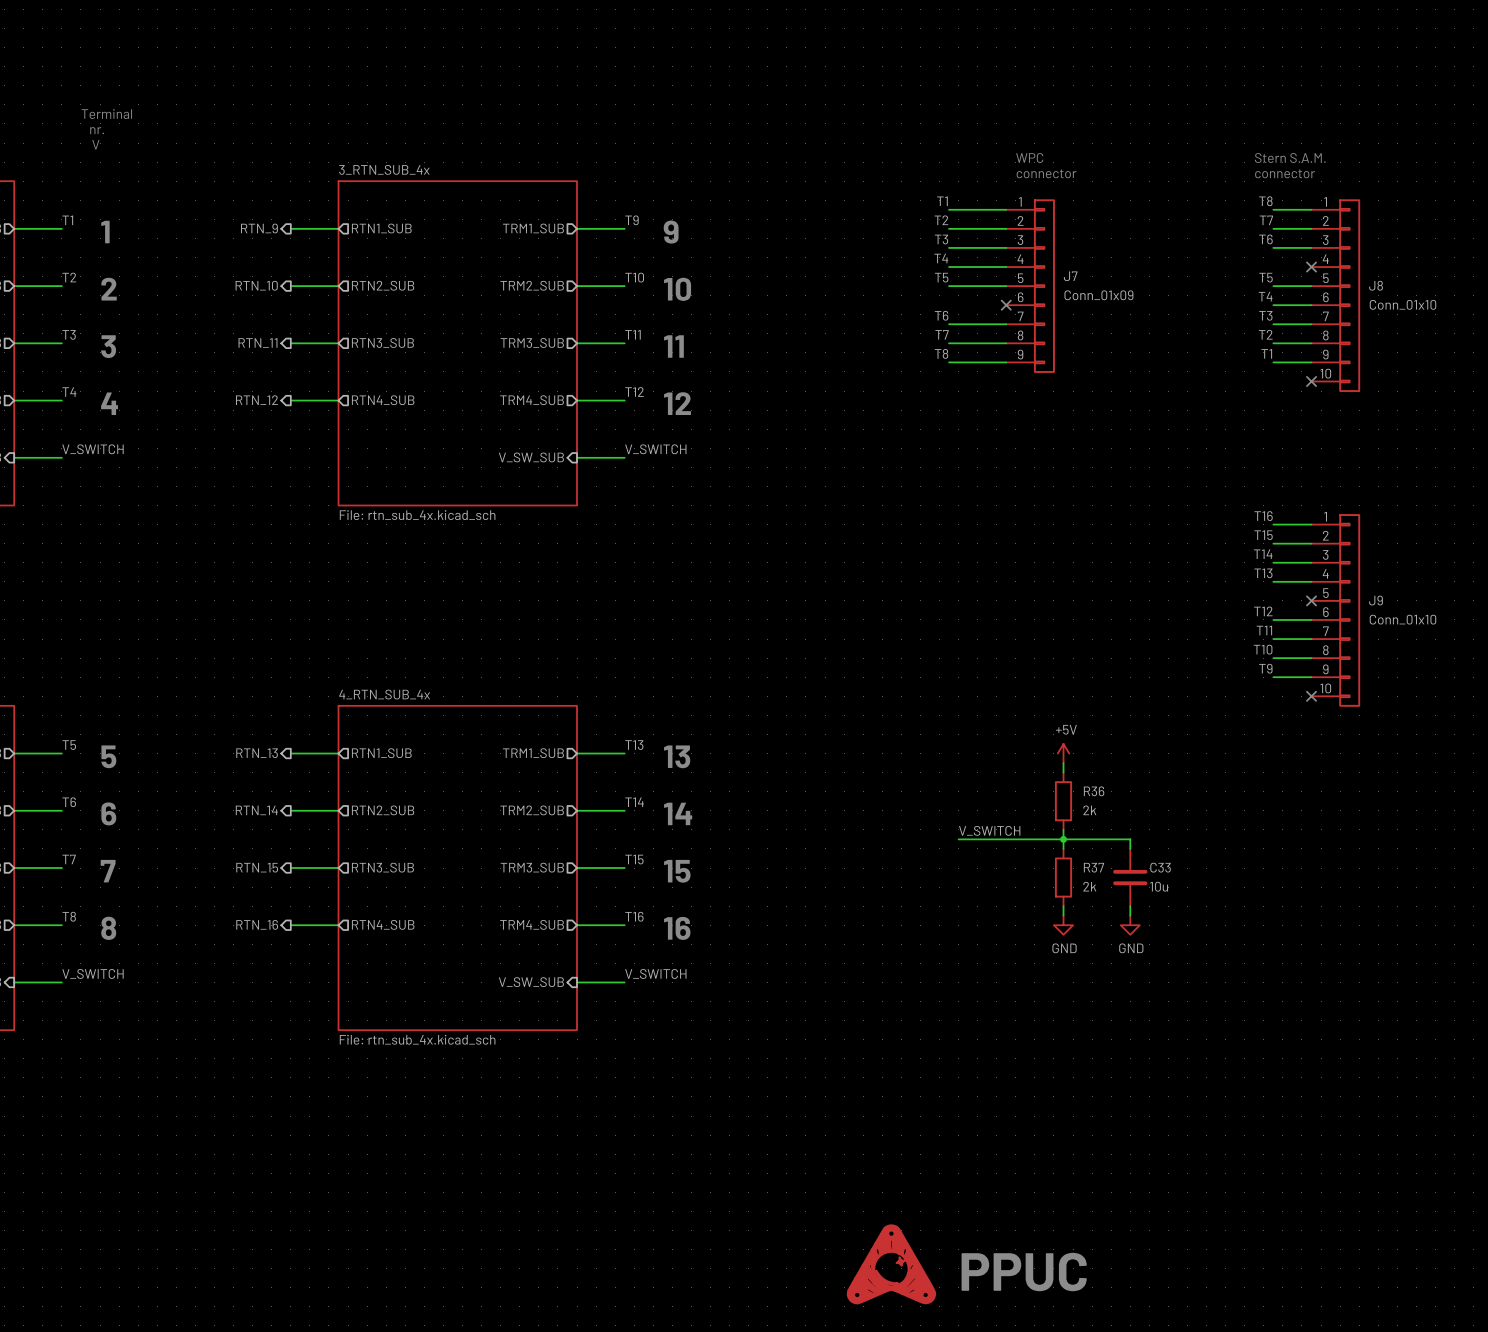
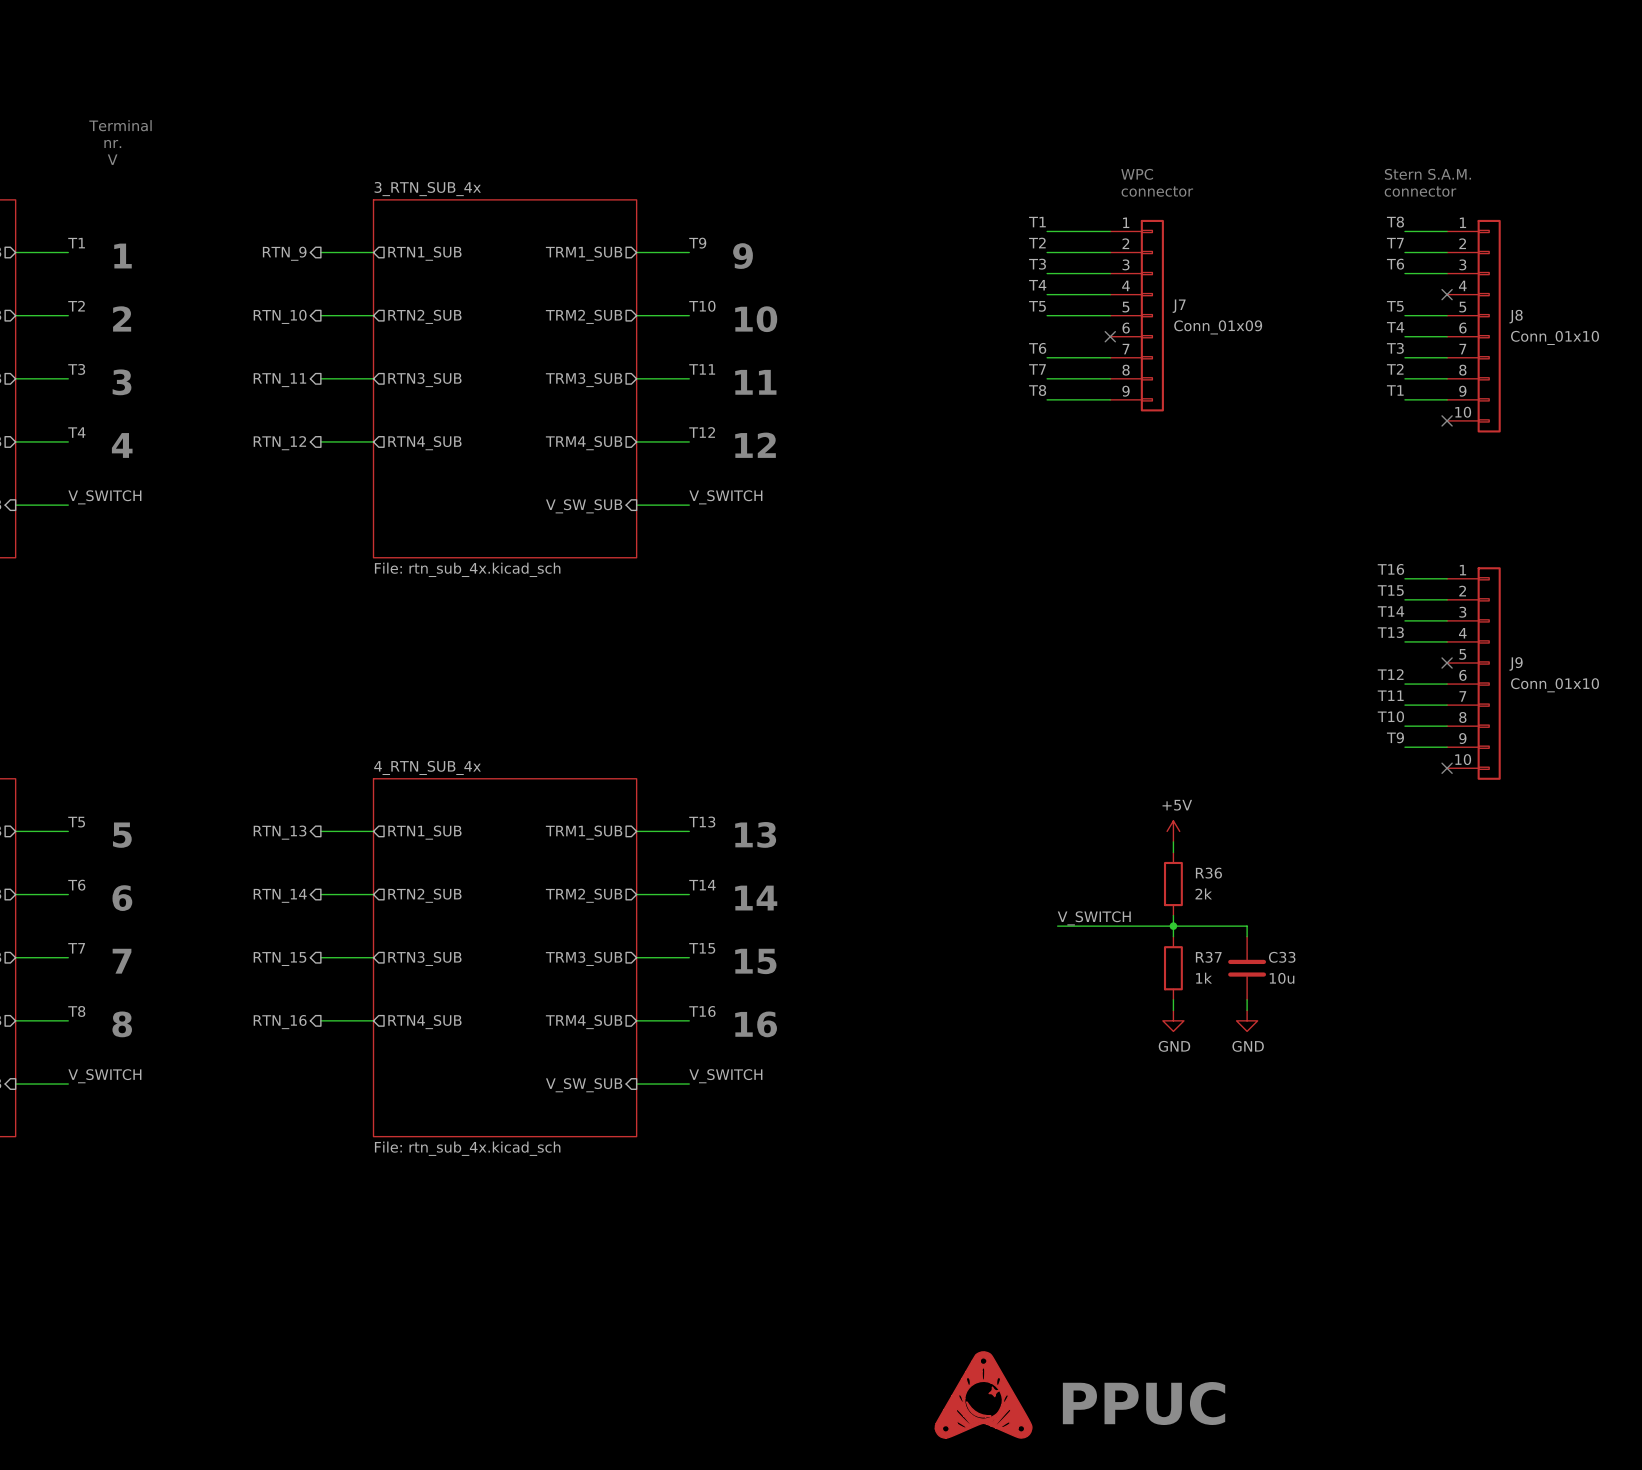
R37 value: 2k (1089, 886) -> 1k (1204, 978)

